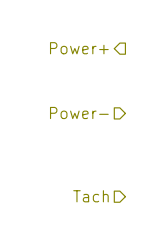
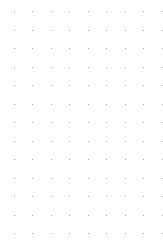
hierarchical label: Power+ (79, 48) -> none
hierarchical label: Power- (79, 112) -> none
hierarchical label: Tach (90, 196) -> none

